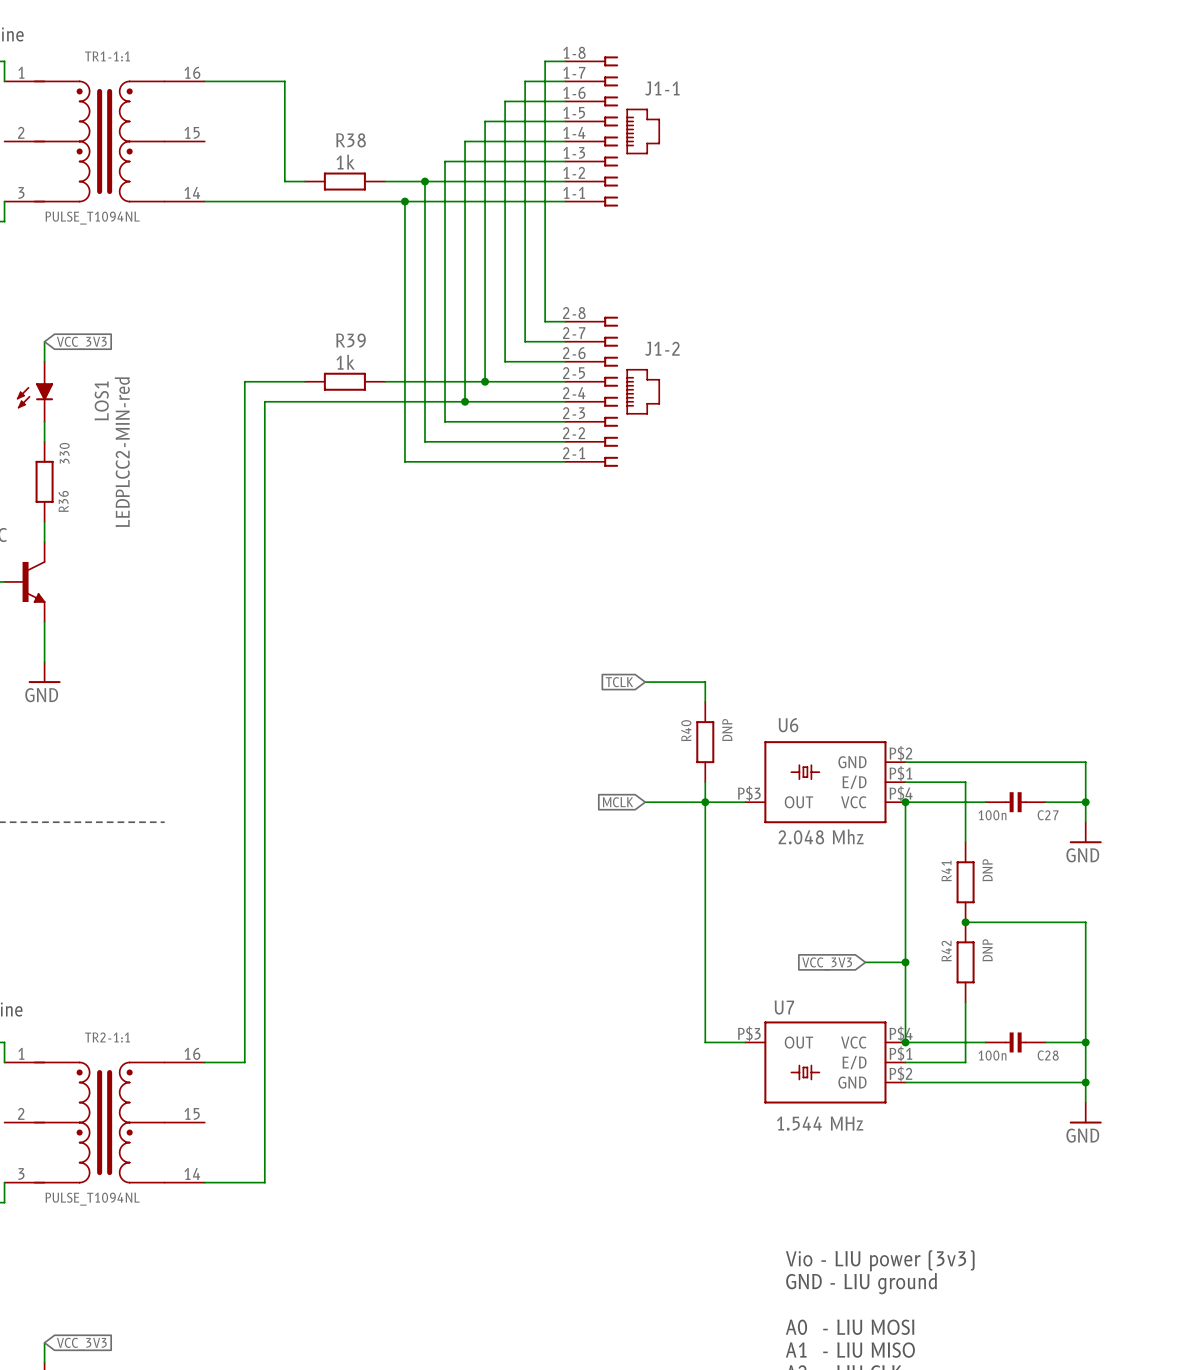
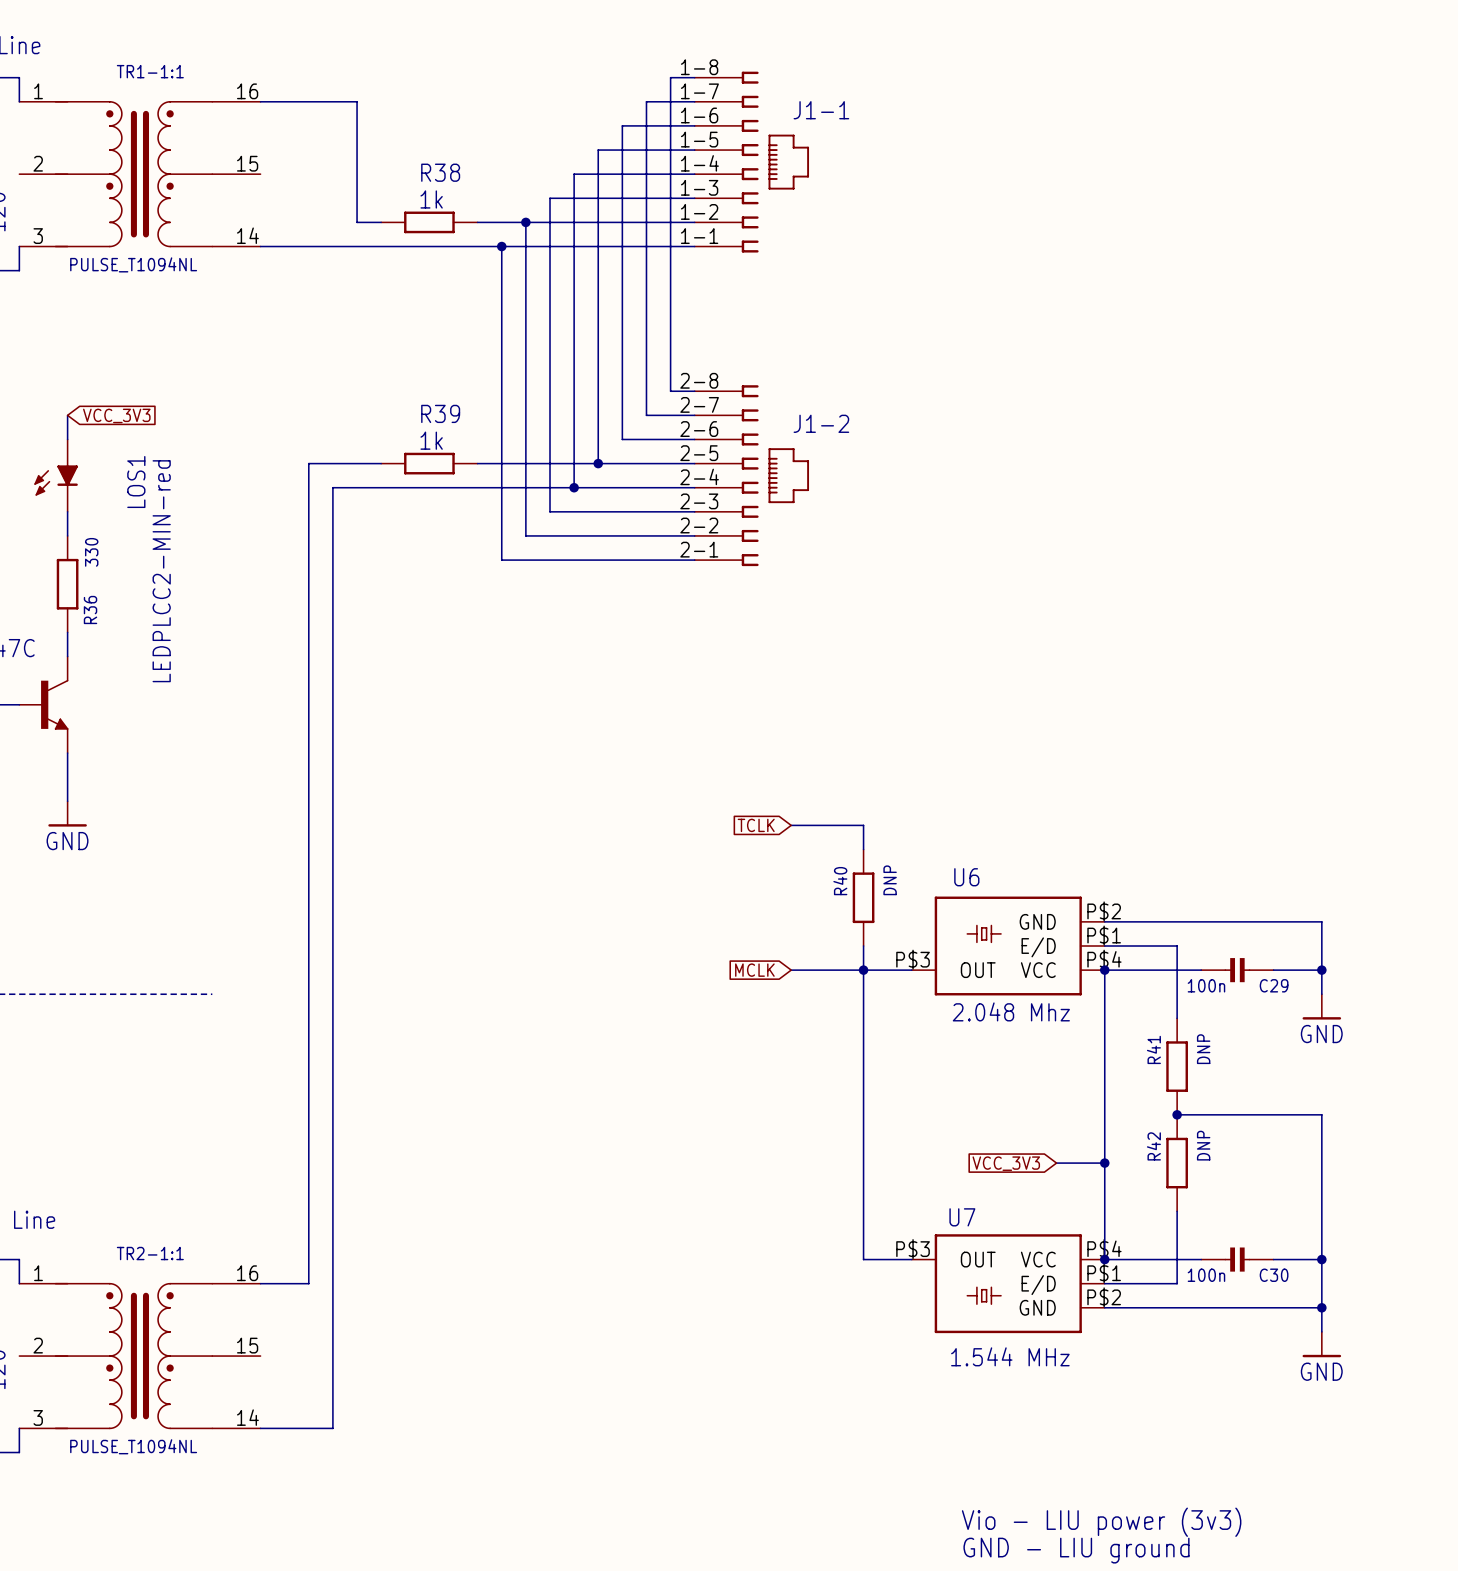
C27 name: C27 (1048, 815) -> C29 (1274, 985)
C28 name: C28 (1048, 1055) -> C30 (1274, 1275)

